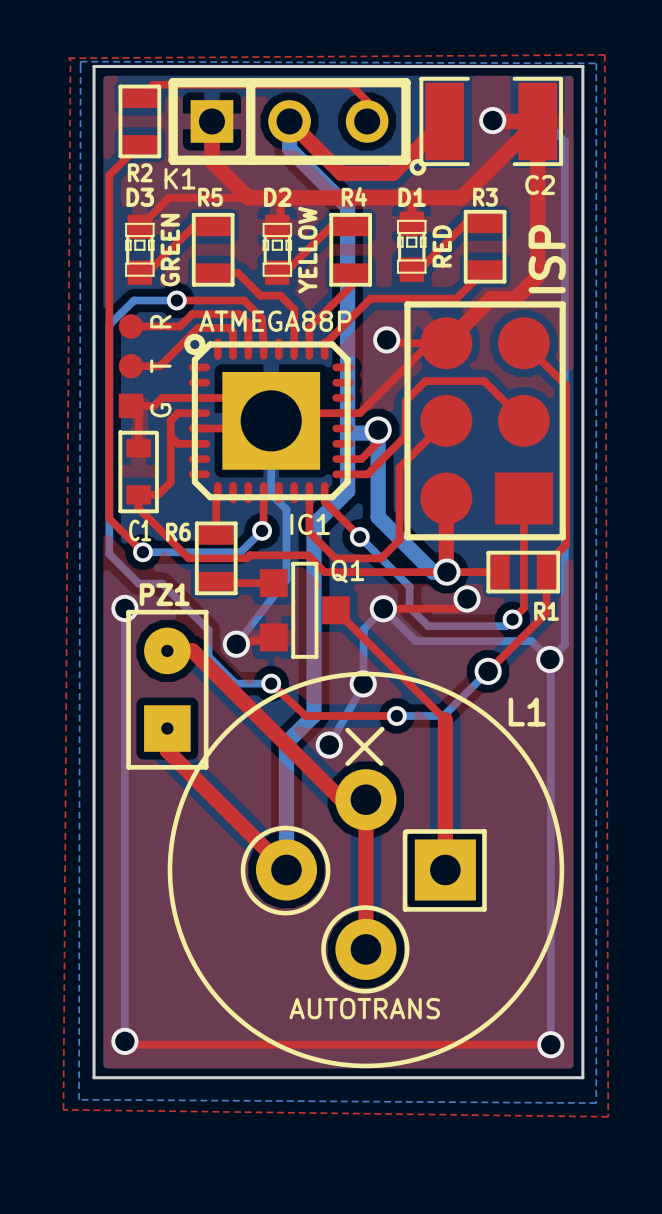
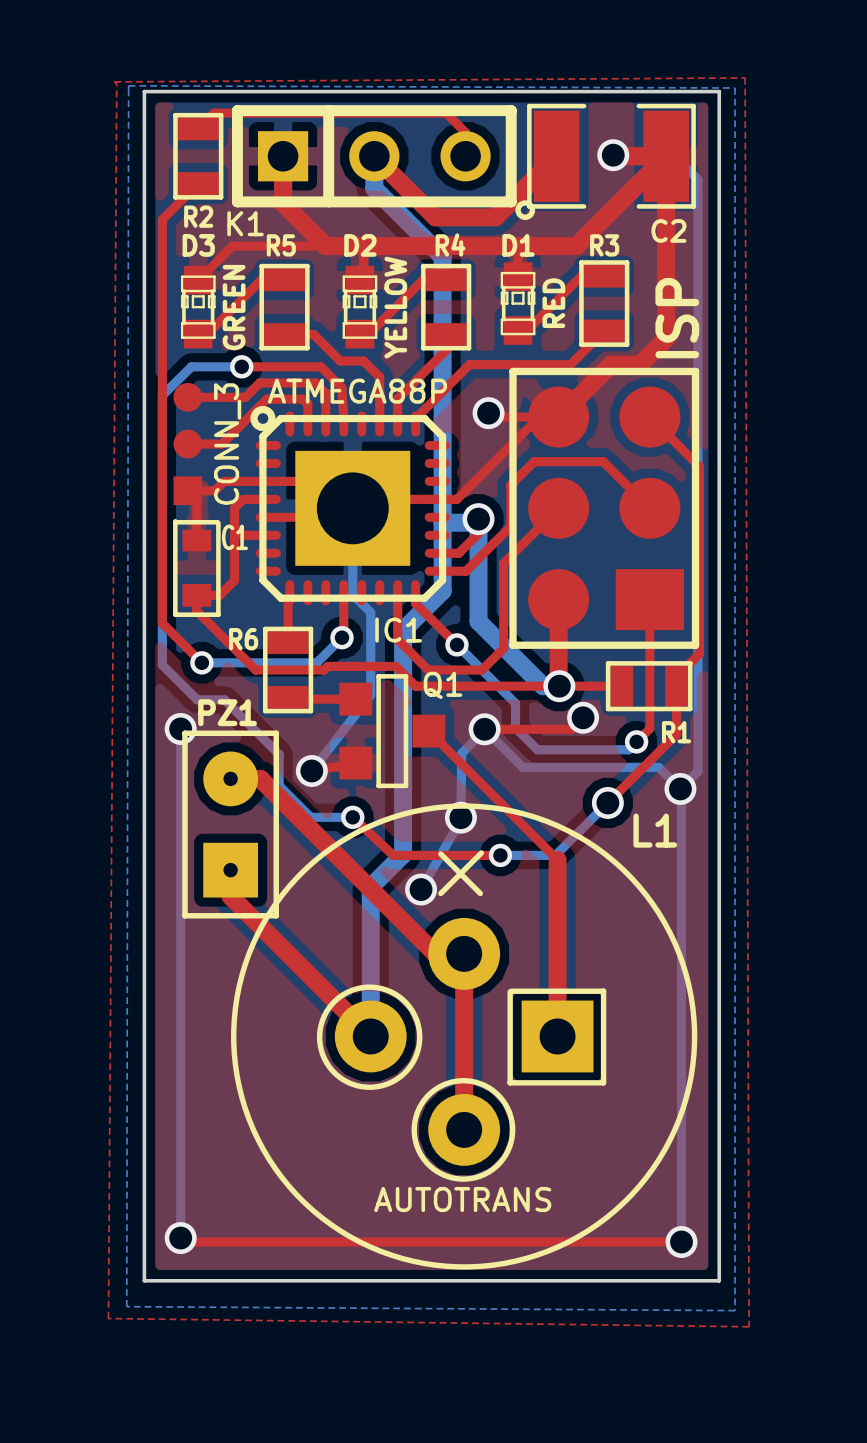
part value: G T R (160, 366) -> CONN_3 (227, 444)
C1 name position: C1 (140, 530) -> C1 (234, 537)
L1 name position: L1 (527, 712) -> L1 (655, 830)
line: (382, 729) (347, 763) -> (481, 852) (440, 893)
line: (347, 730) (381, 763) -> (440, 853) (480, 893)

